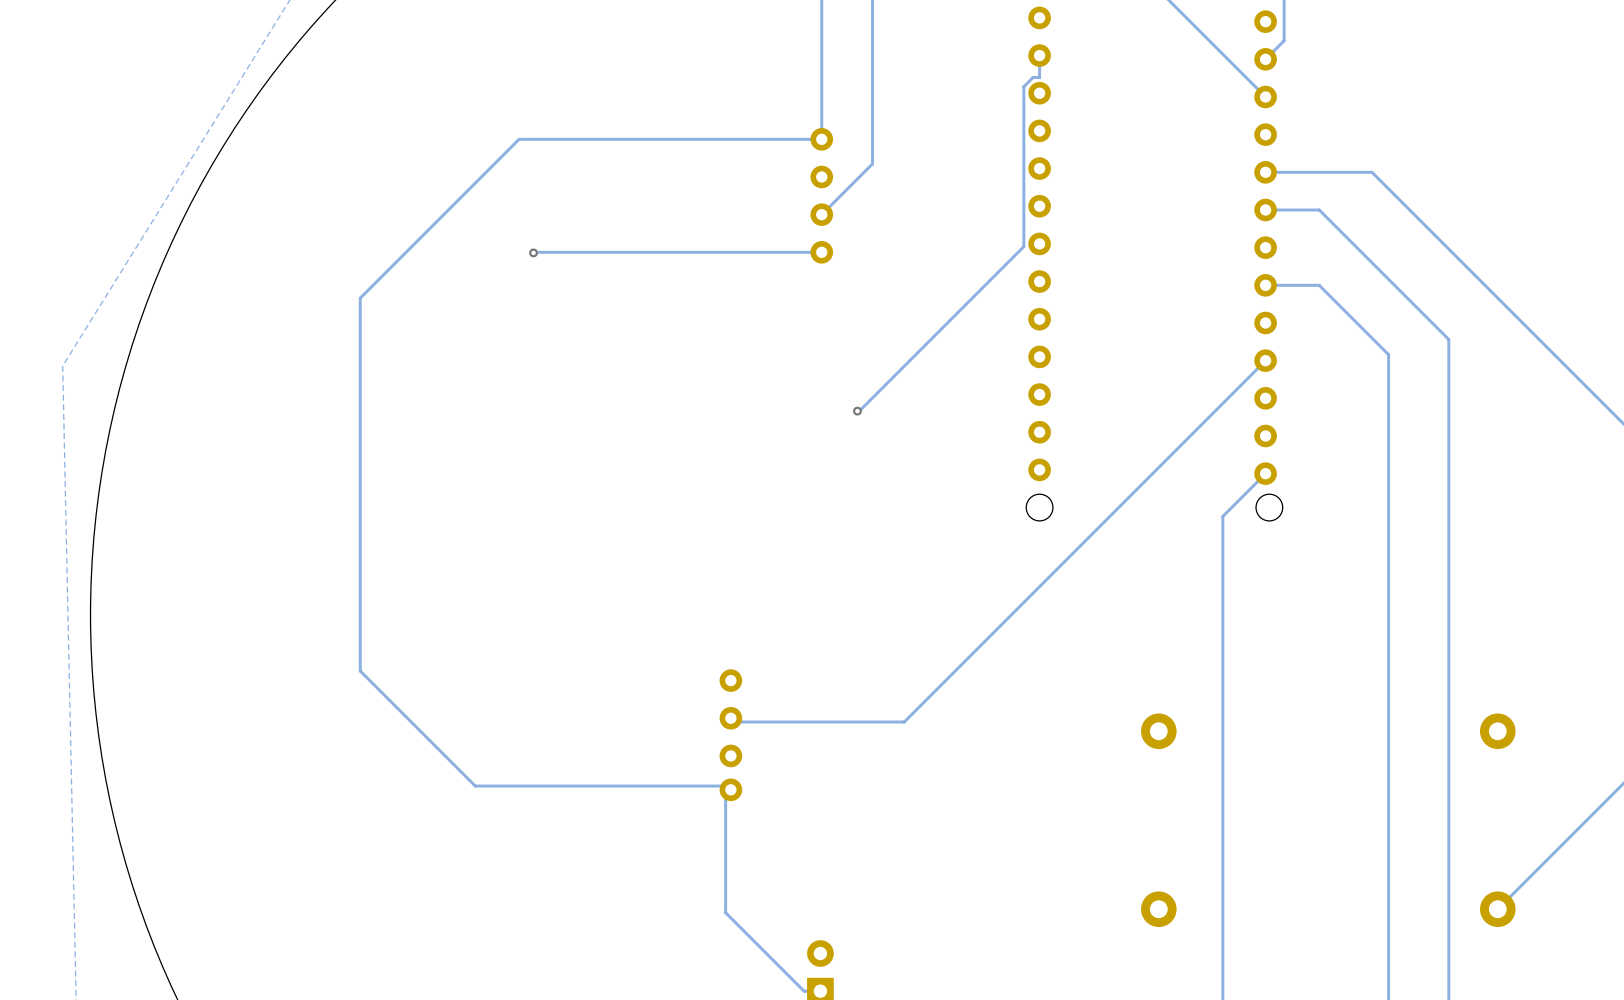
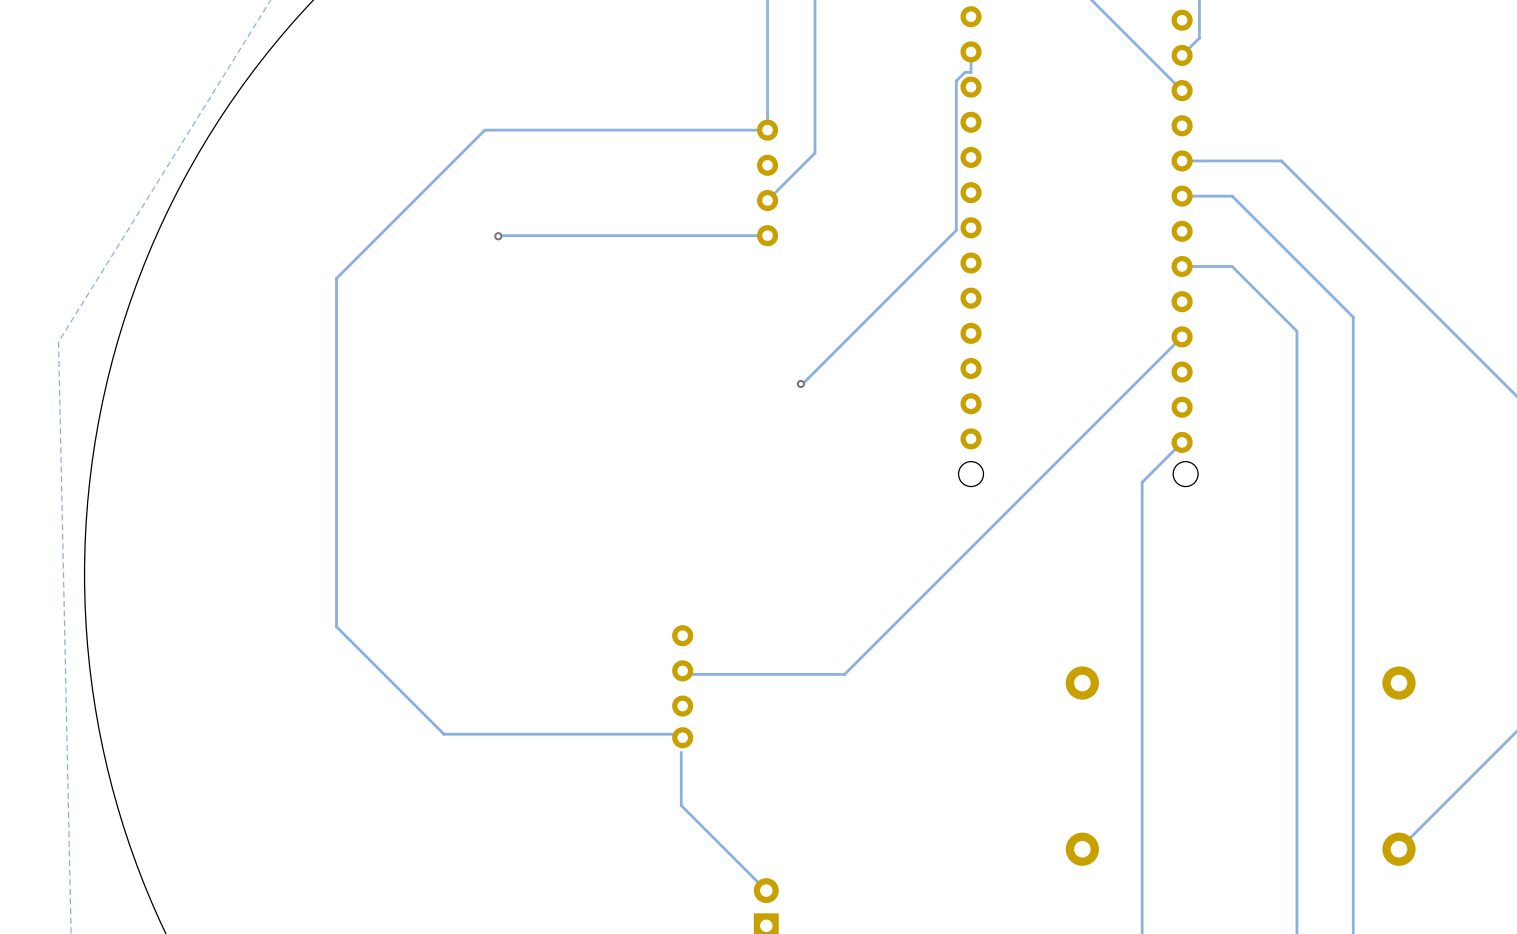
track: (730, 786) (725, 791) (725, 912) (804, 991) (820, 991) -> none
track: none -> (681, 752) (681, 805) (766, 890)

